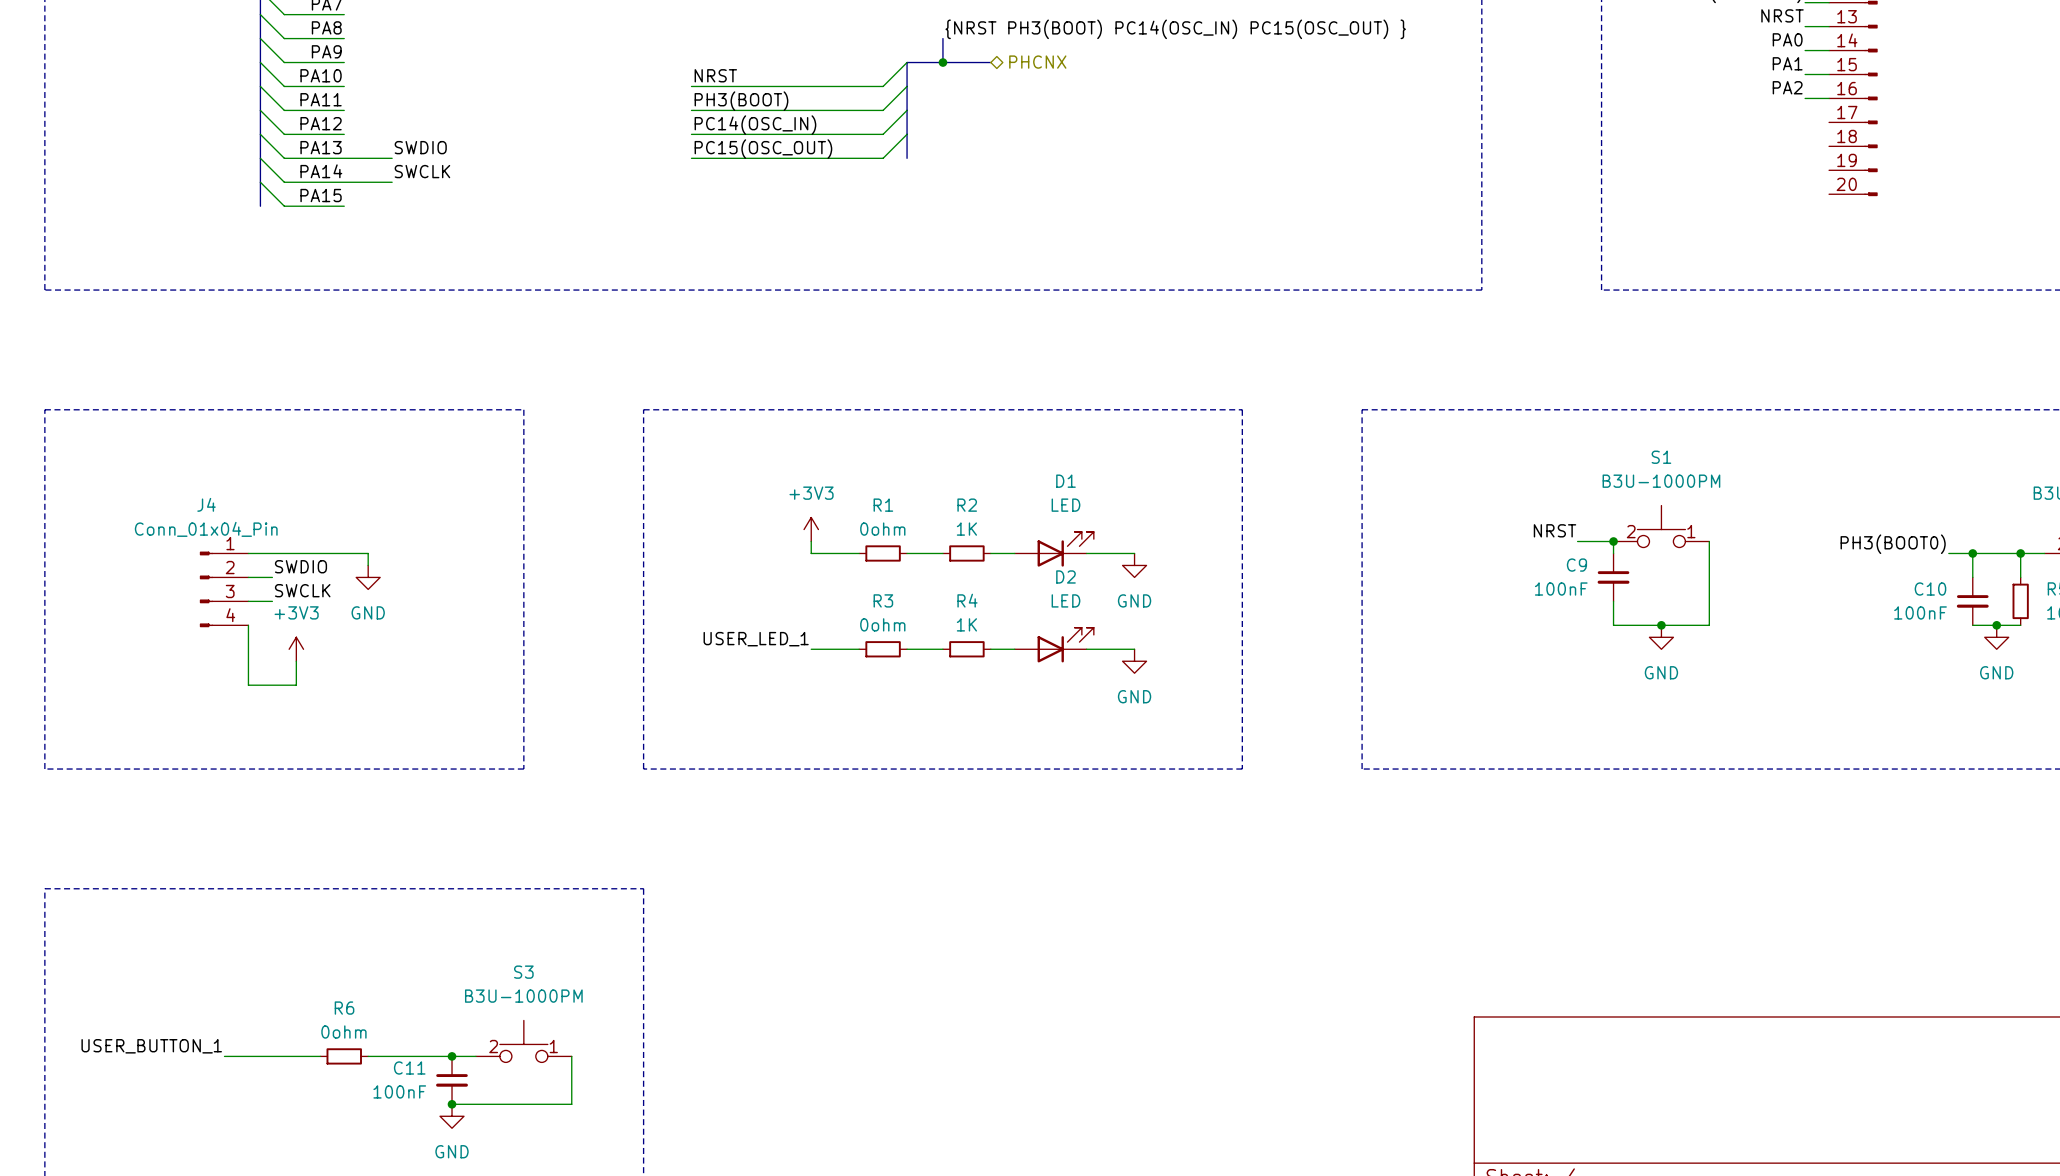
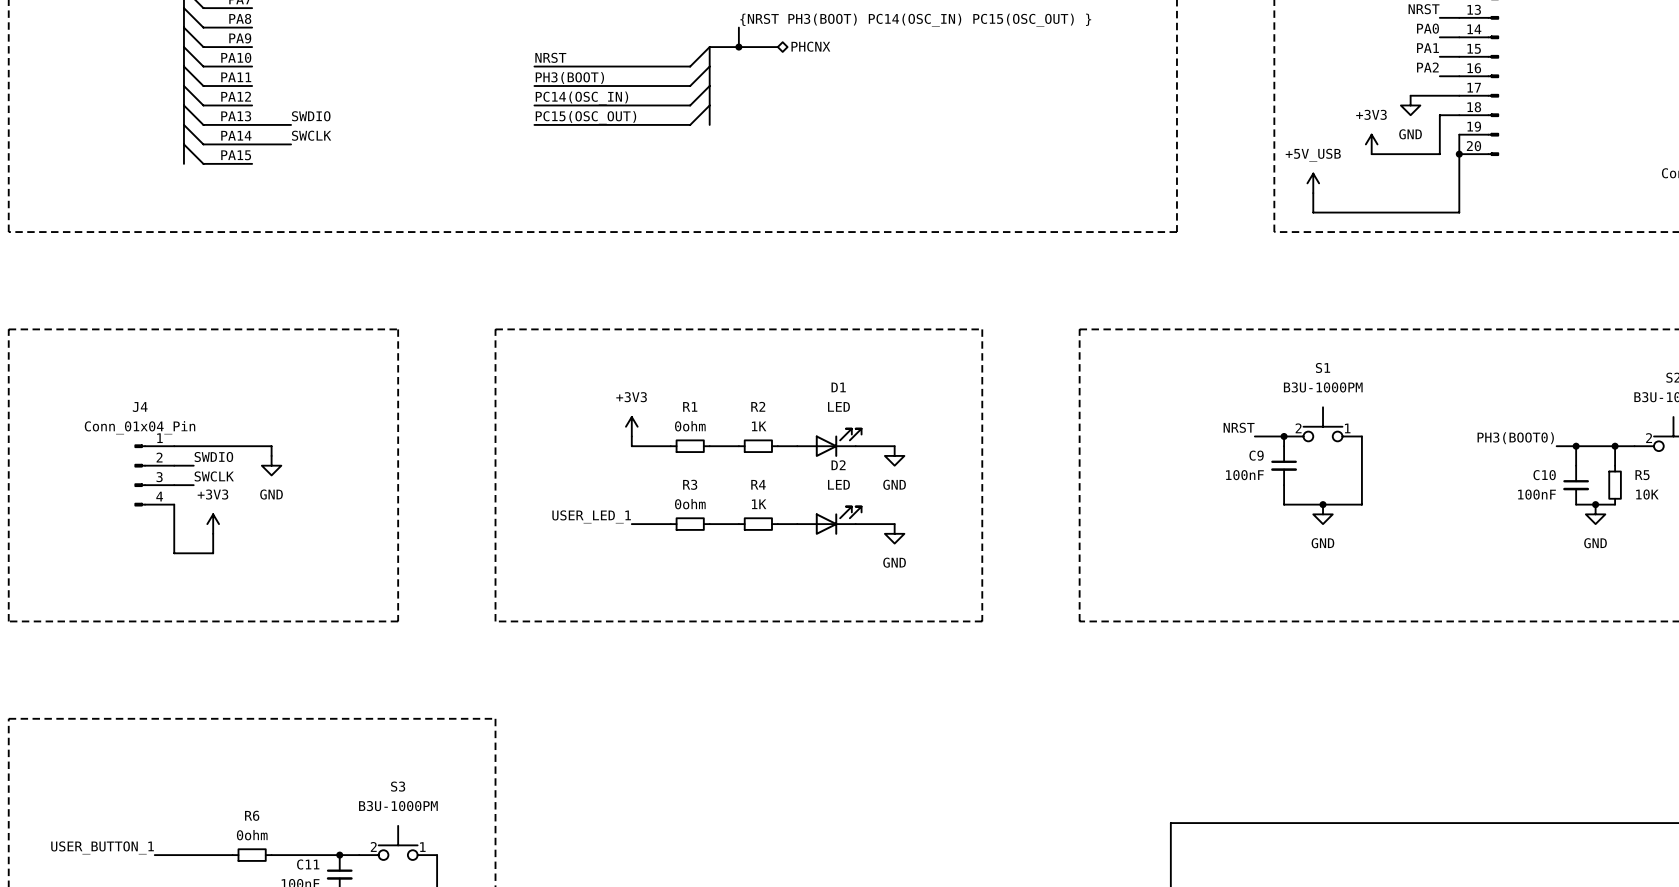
wire: none -> (1410, 95) (1459, 95)
power symbol: none -> GND (1410, 105)
wire: none -> (1459, 115) (1439, 115) (1439, 154) (1371, 154)
wire: none -> (1459, 134) (1459, 212) (1313, 212) (1313, 193)
power symbol: none -> +3V3 (1371, 144)
junction: none -> (1459, 154)
power symbol: none -> +5V_USB (1313, 183)

